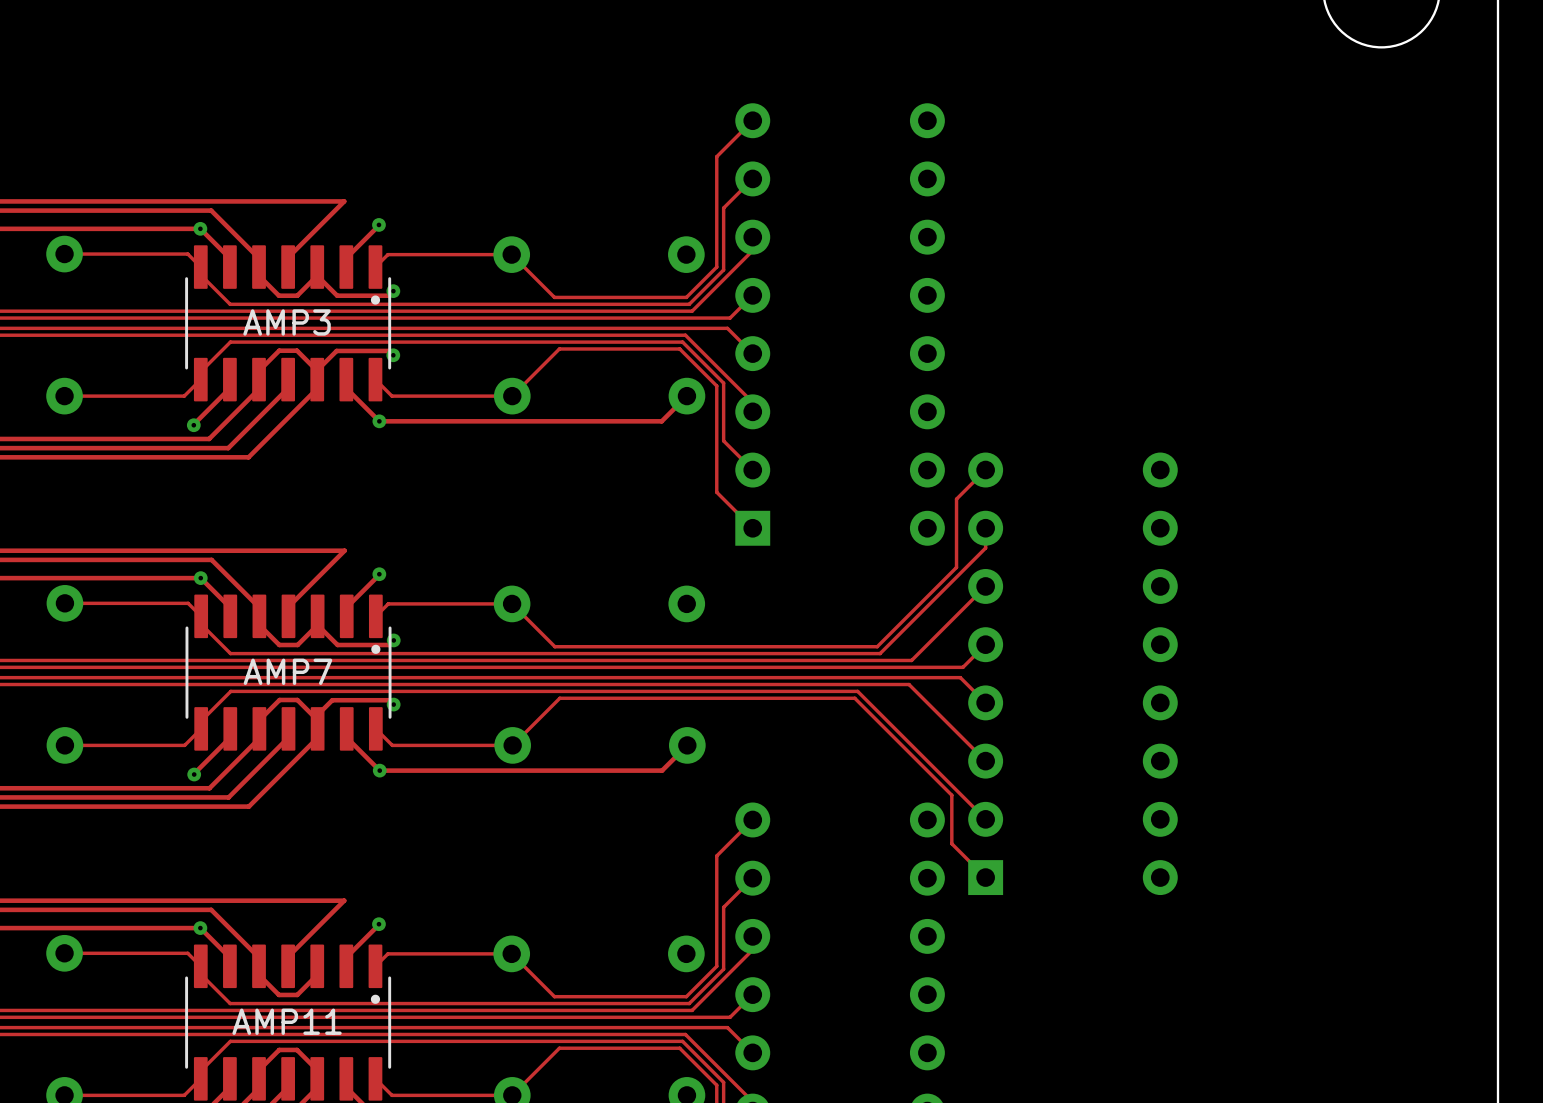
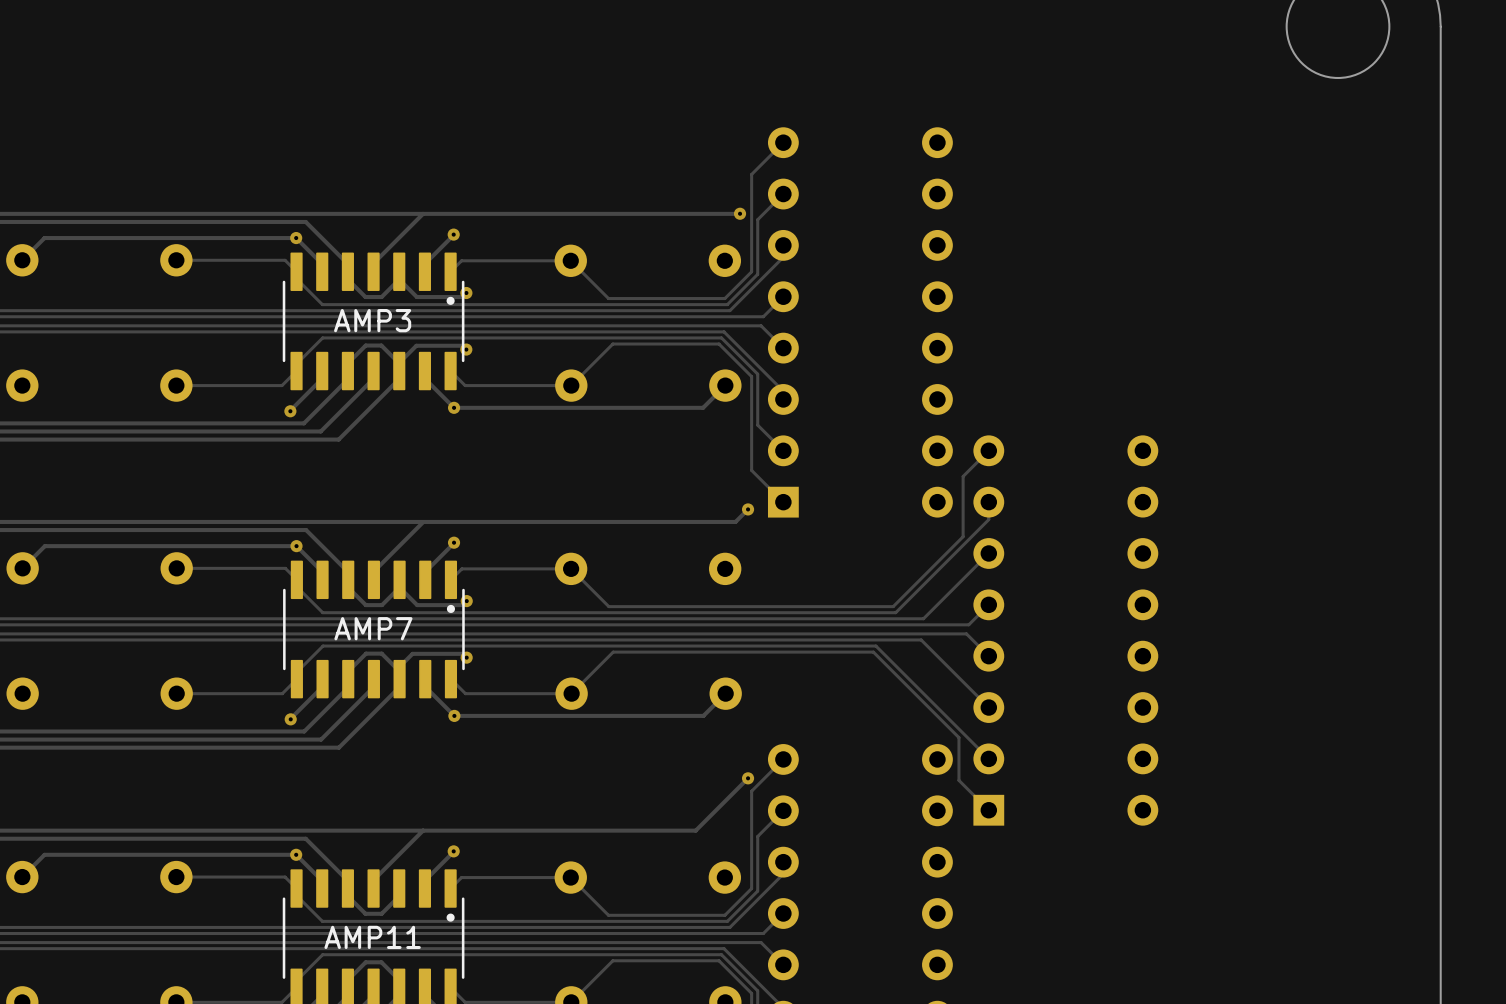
track: none -> (423, 213) (739, 213)
via: none -> (740, 213)
track: none -> (748, 509) (735, 521) (423, 521)
via: none -> (748, 509)
track: none -> (748, 778) (695, 830) (423, 830)
via: none -> (748, 778)

